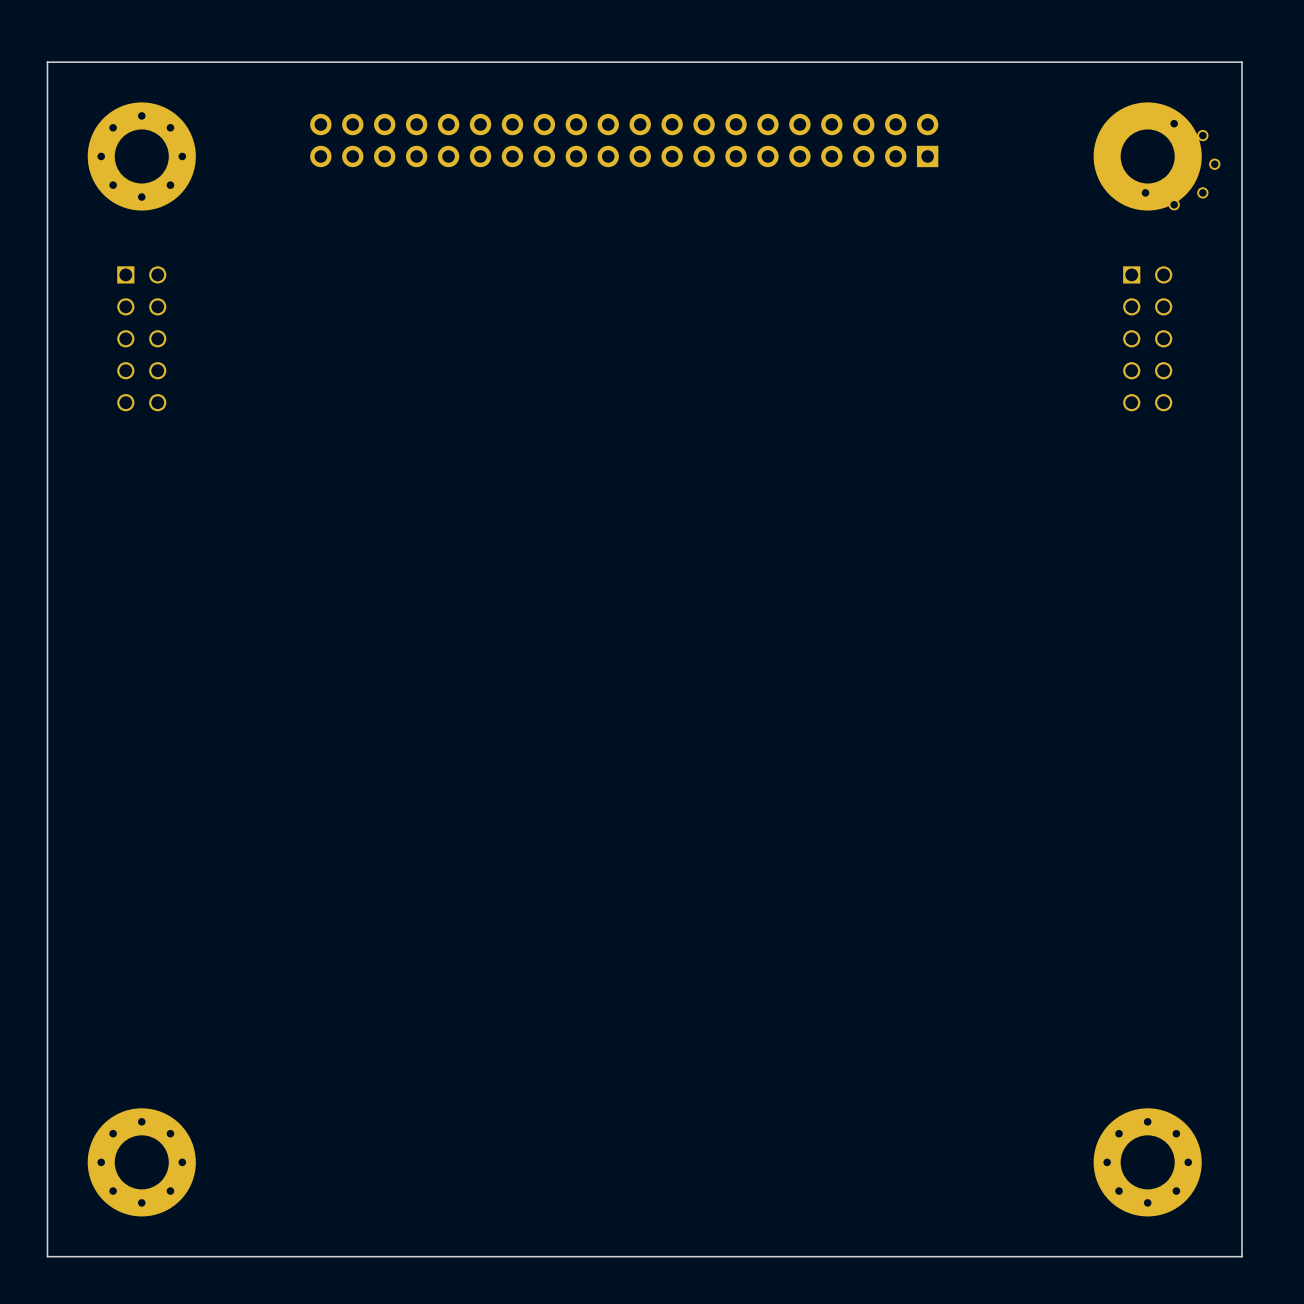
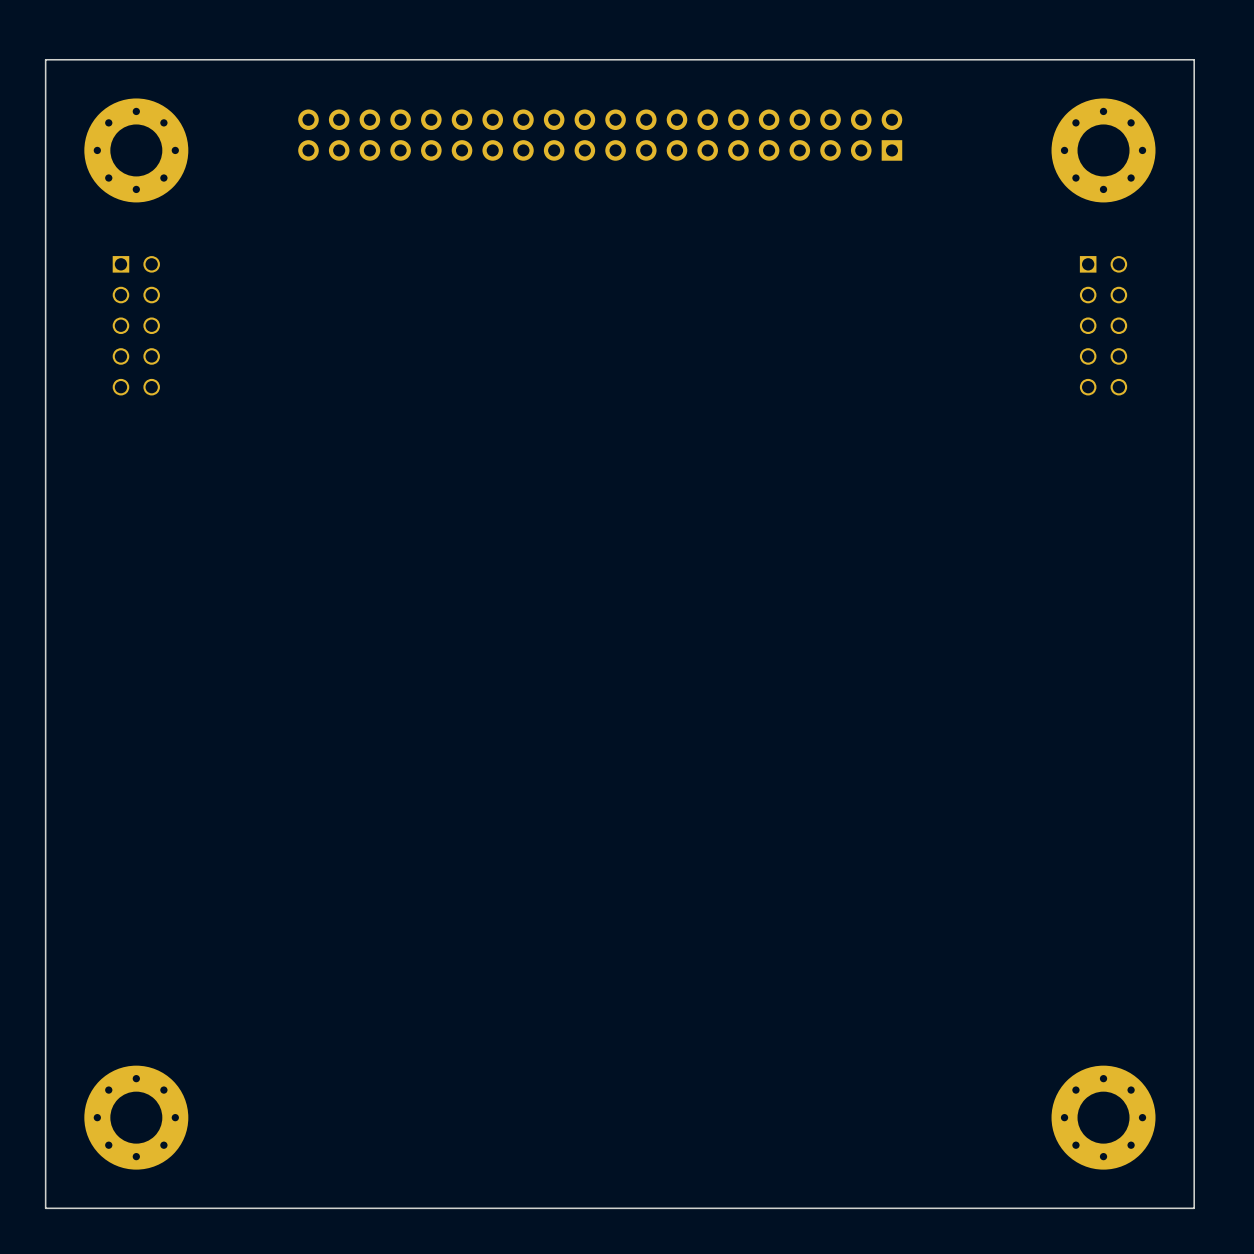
part footprint: [1093, 102, 1221, 211] -> [1051, 98, 1156, 203]

